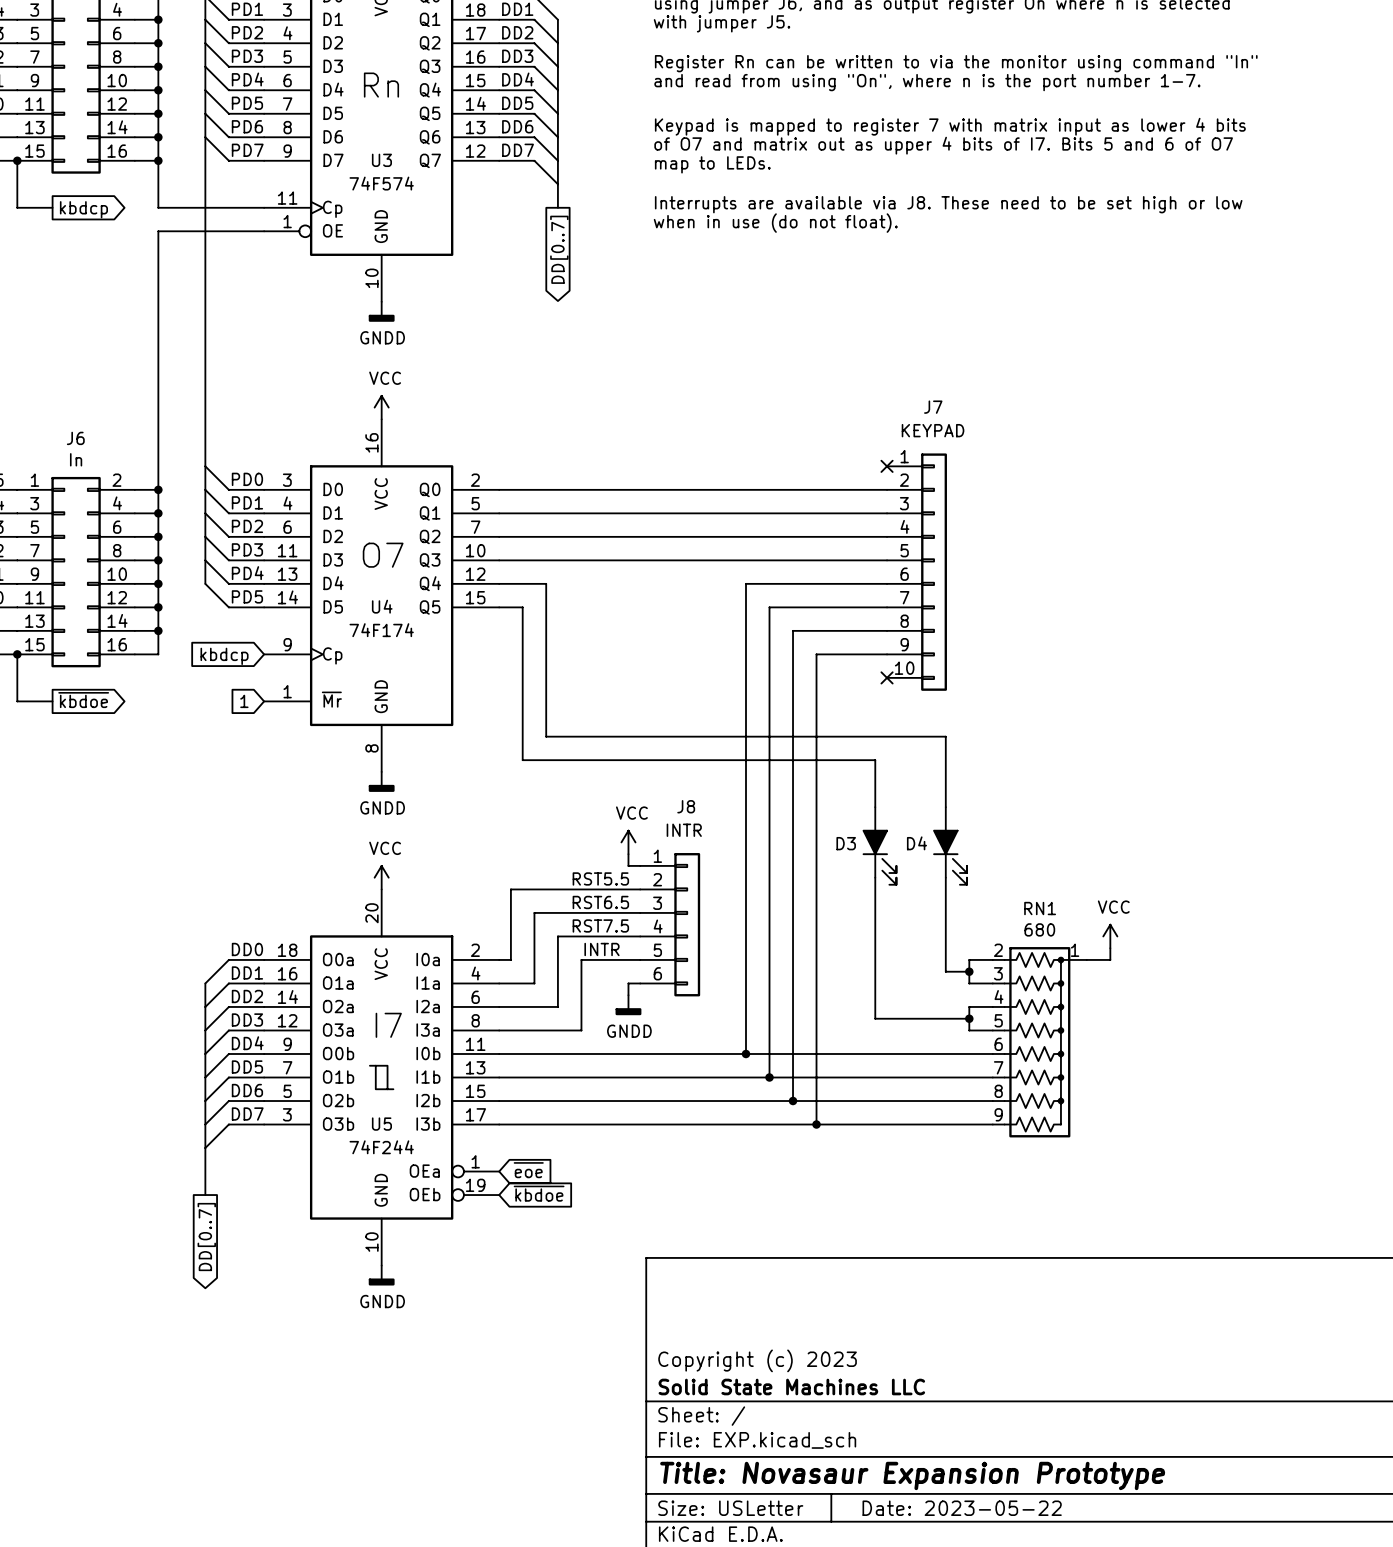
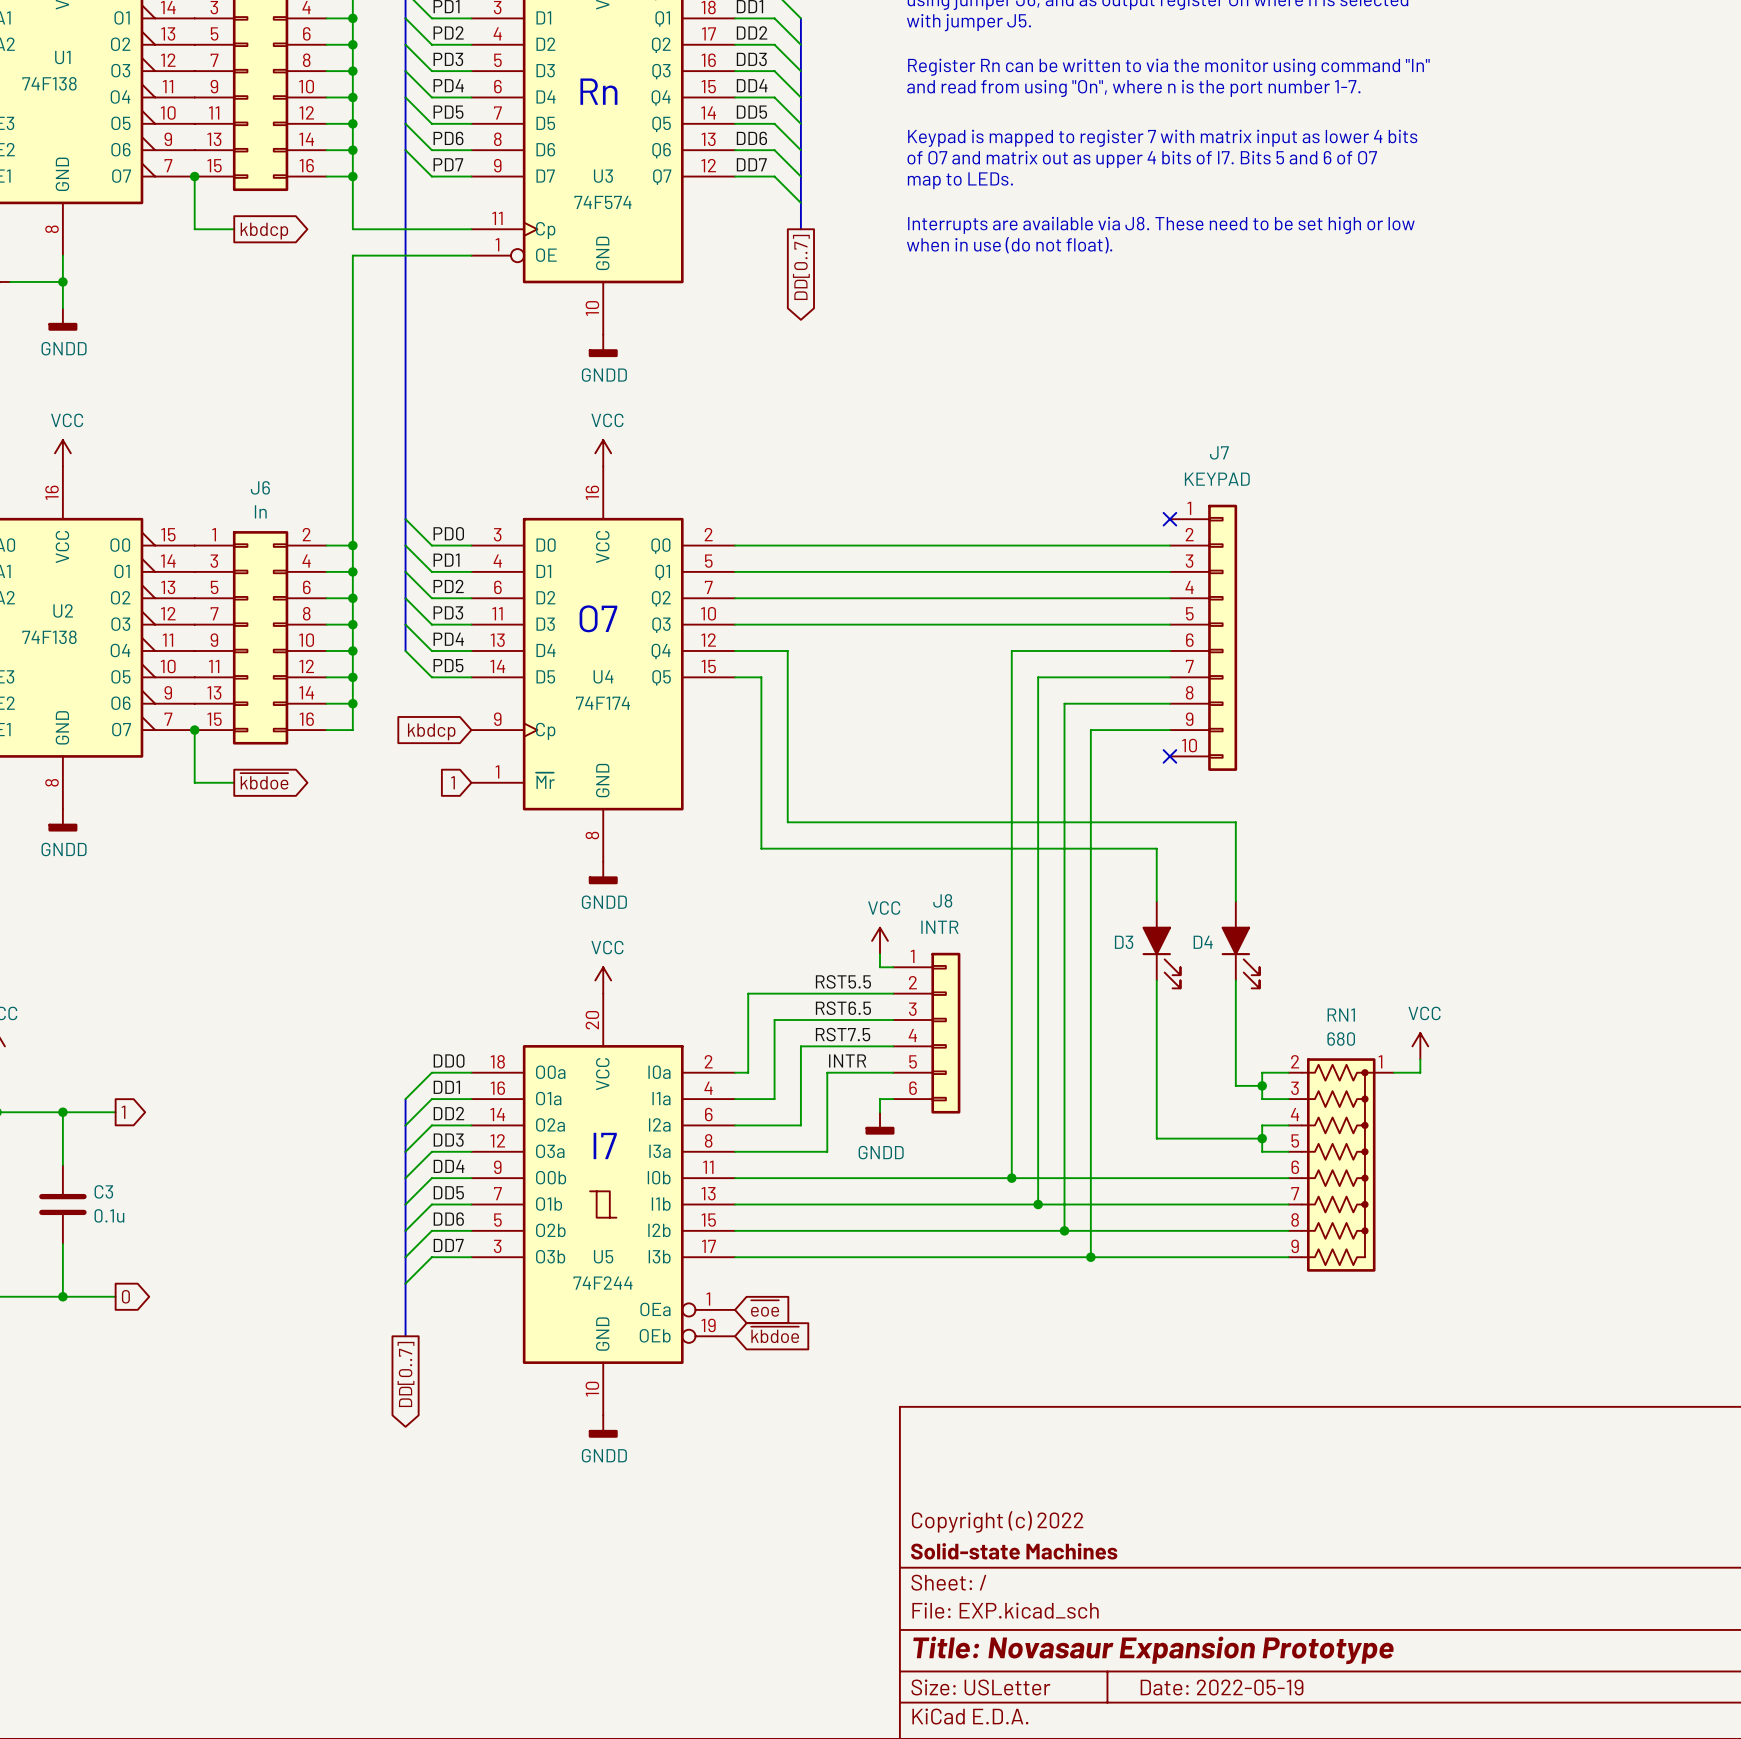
title block: Copyright (c) 2023 (757, 1360) -> Copyright (c) 2022 (997, 1521)
title block: Solid State Machines LLC (791, 1386) -> Solid-state Machines (1014, 1551)
title block: Date: 2023-05-22 (962, 1508) -> Date: 2022-05-19 (1222, 1687)

